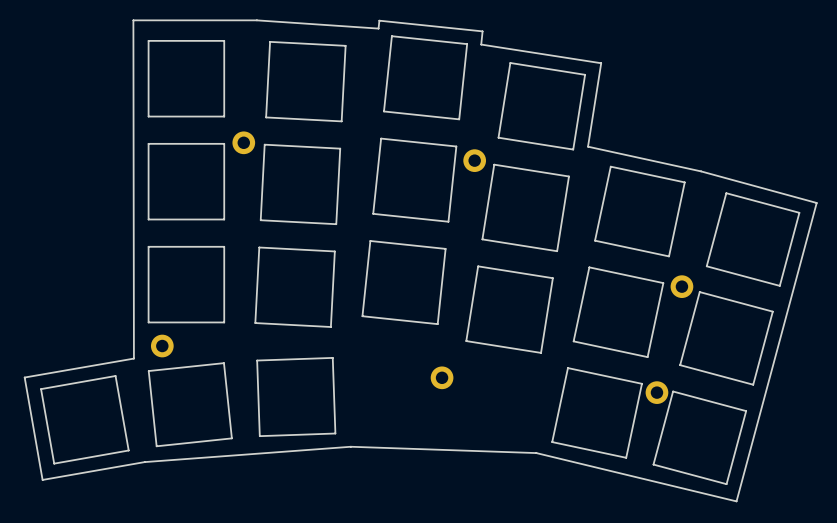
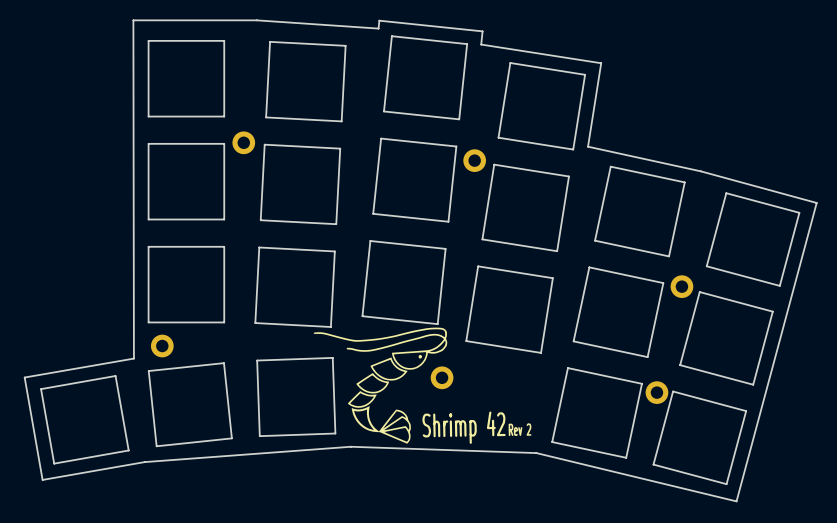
drawing: none -> [313, 327, 448, 444]
text: none -> Shrimp 42 (464, 427)
text: none -> Rev 2 (520, 429)

